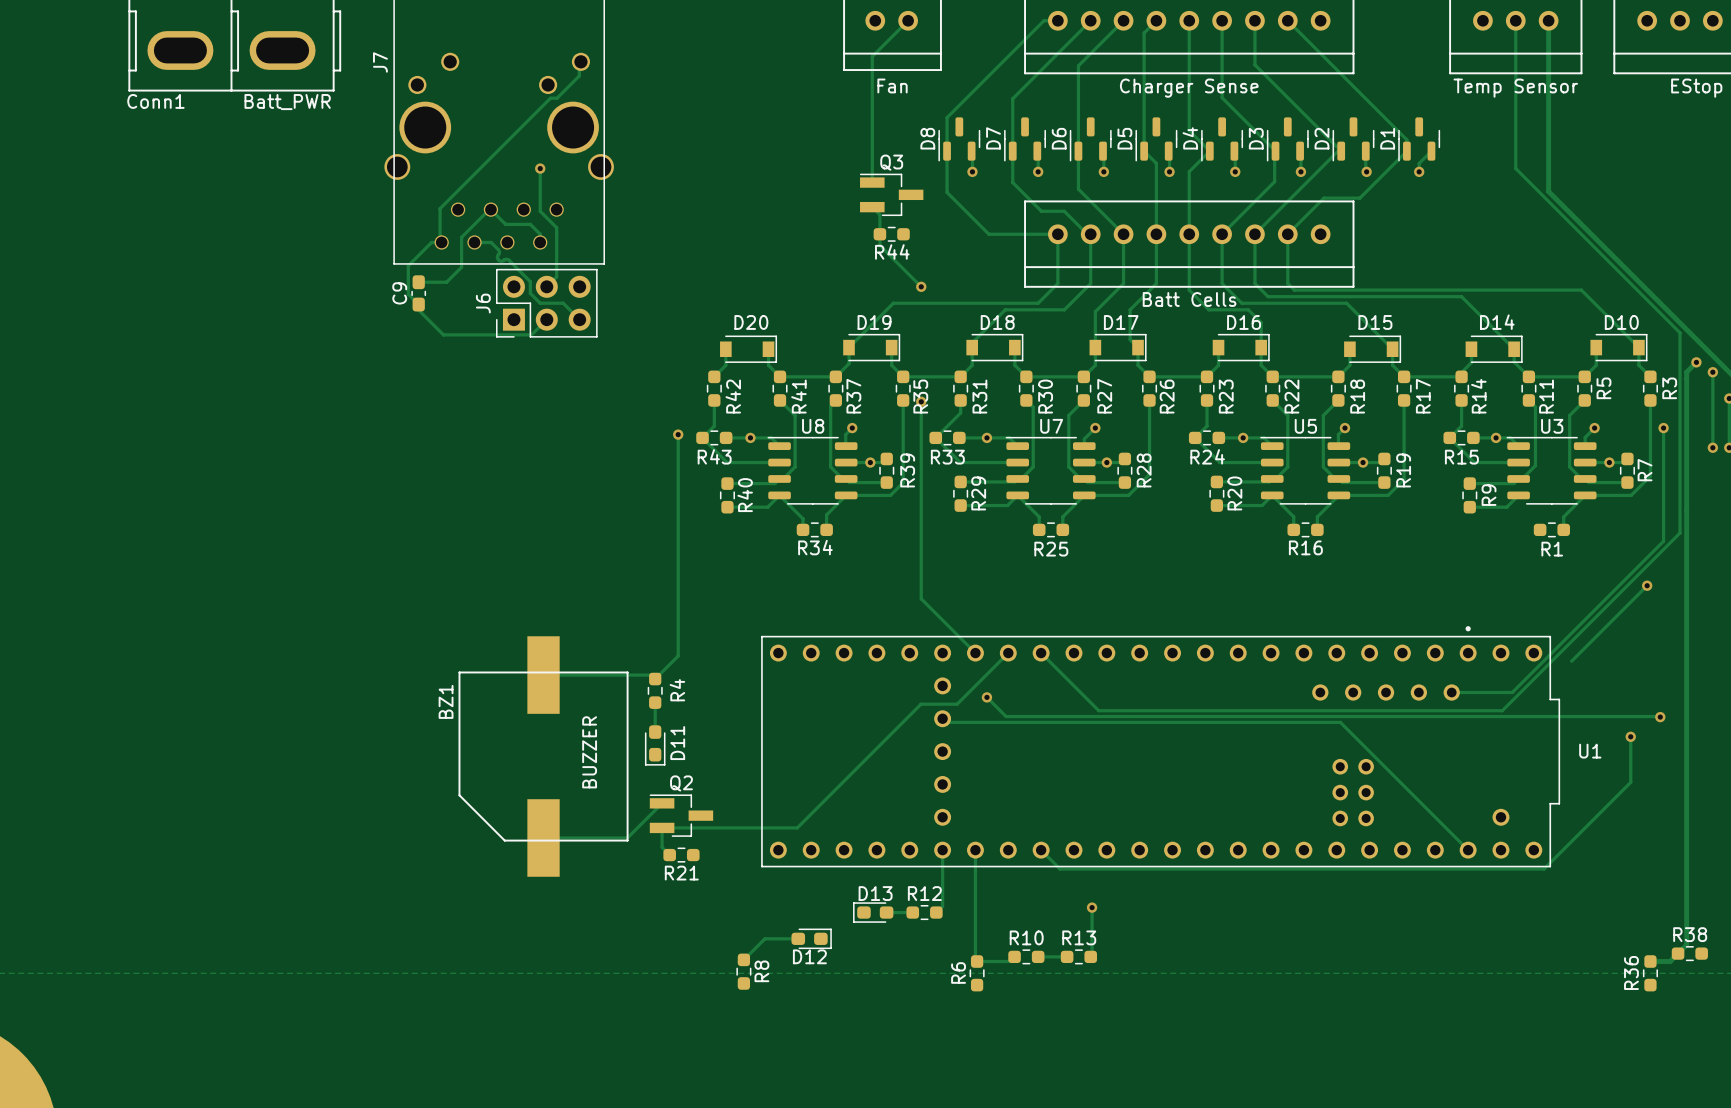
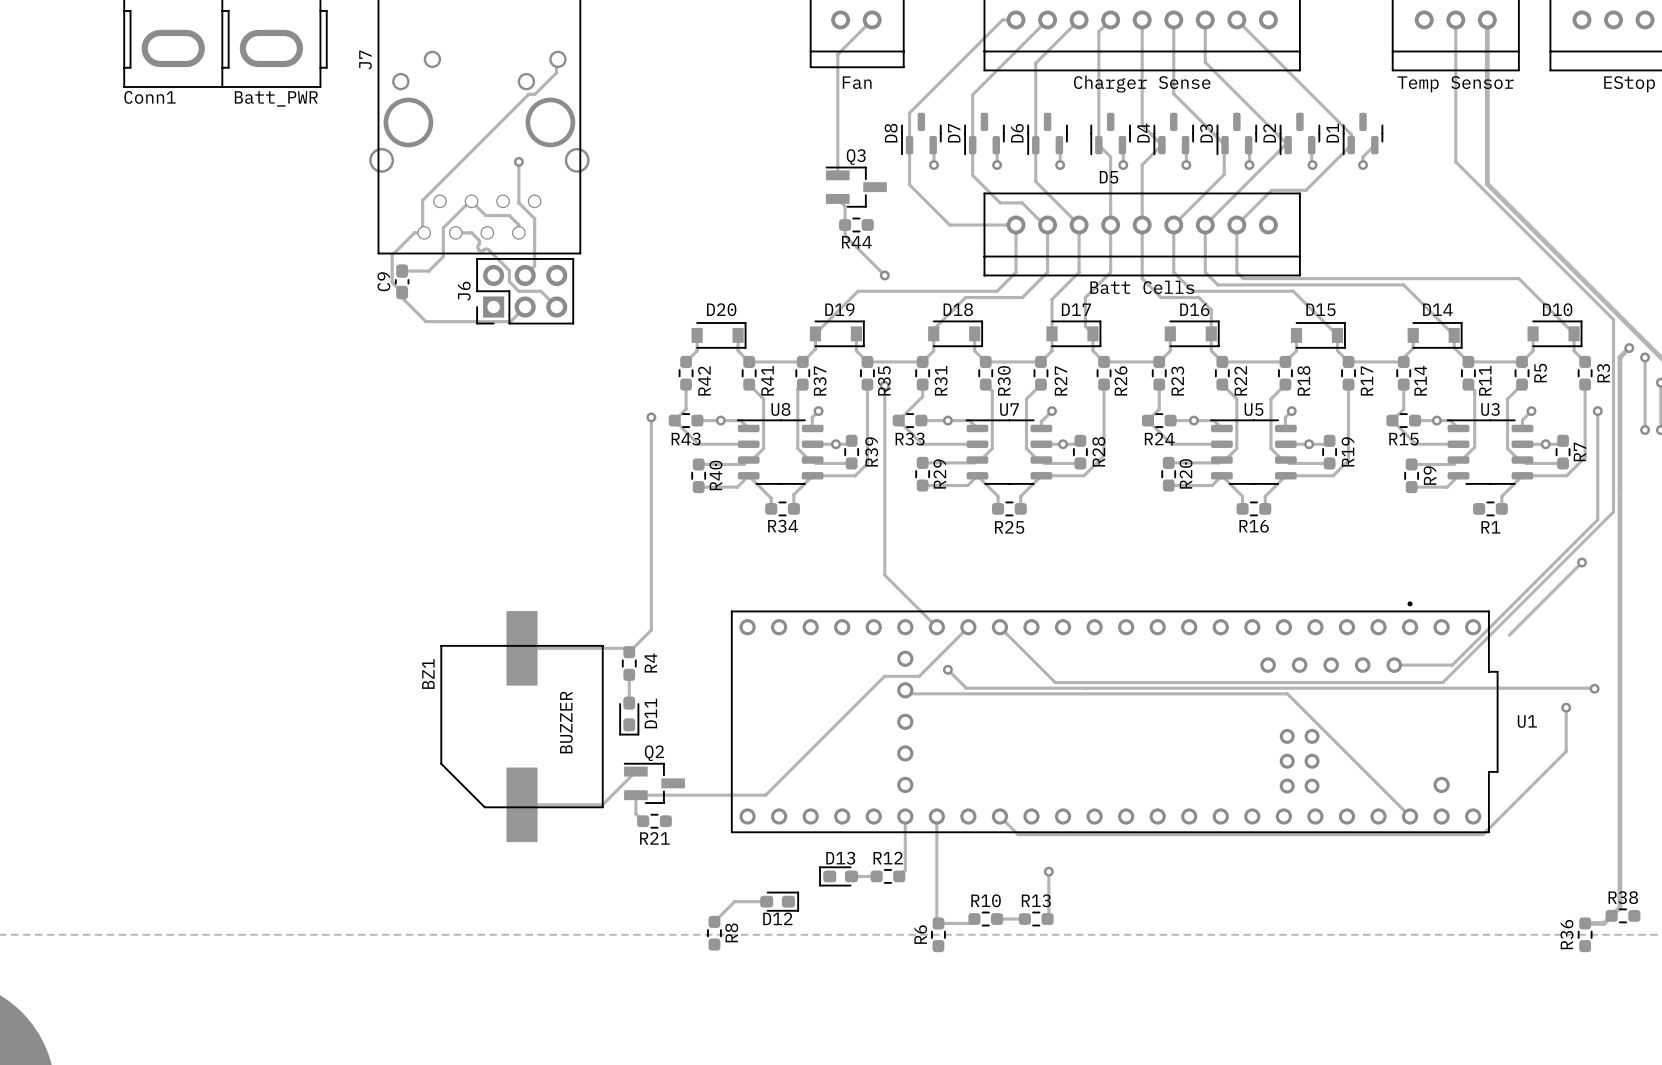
D5 name rotation: 0° (1124, 138) -> 90° clockwise (1109, 177)
D5 name position: D5 (1124, 138) -> D5 (1109, 177)

